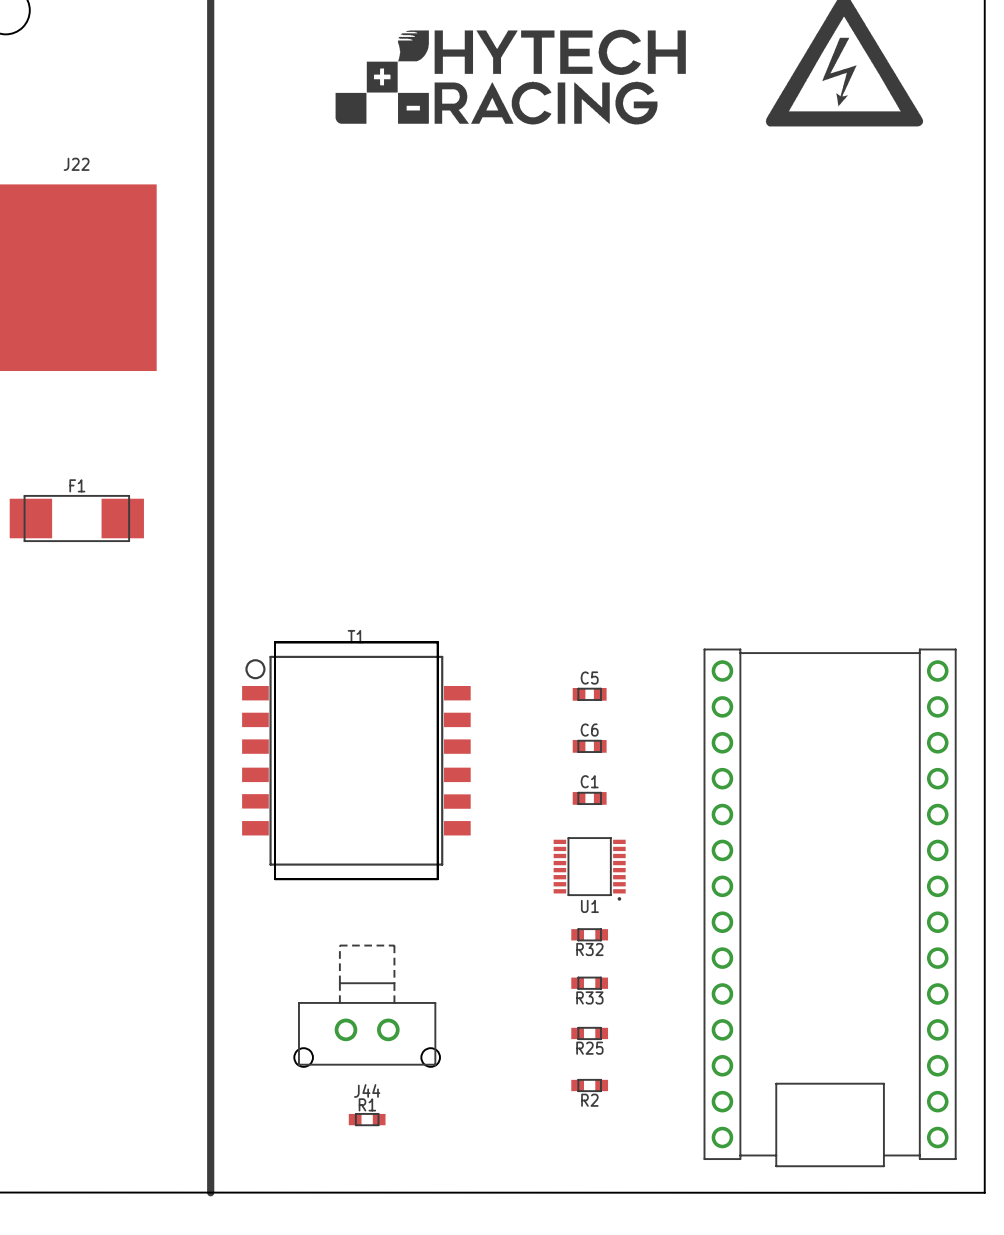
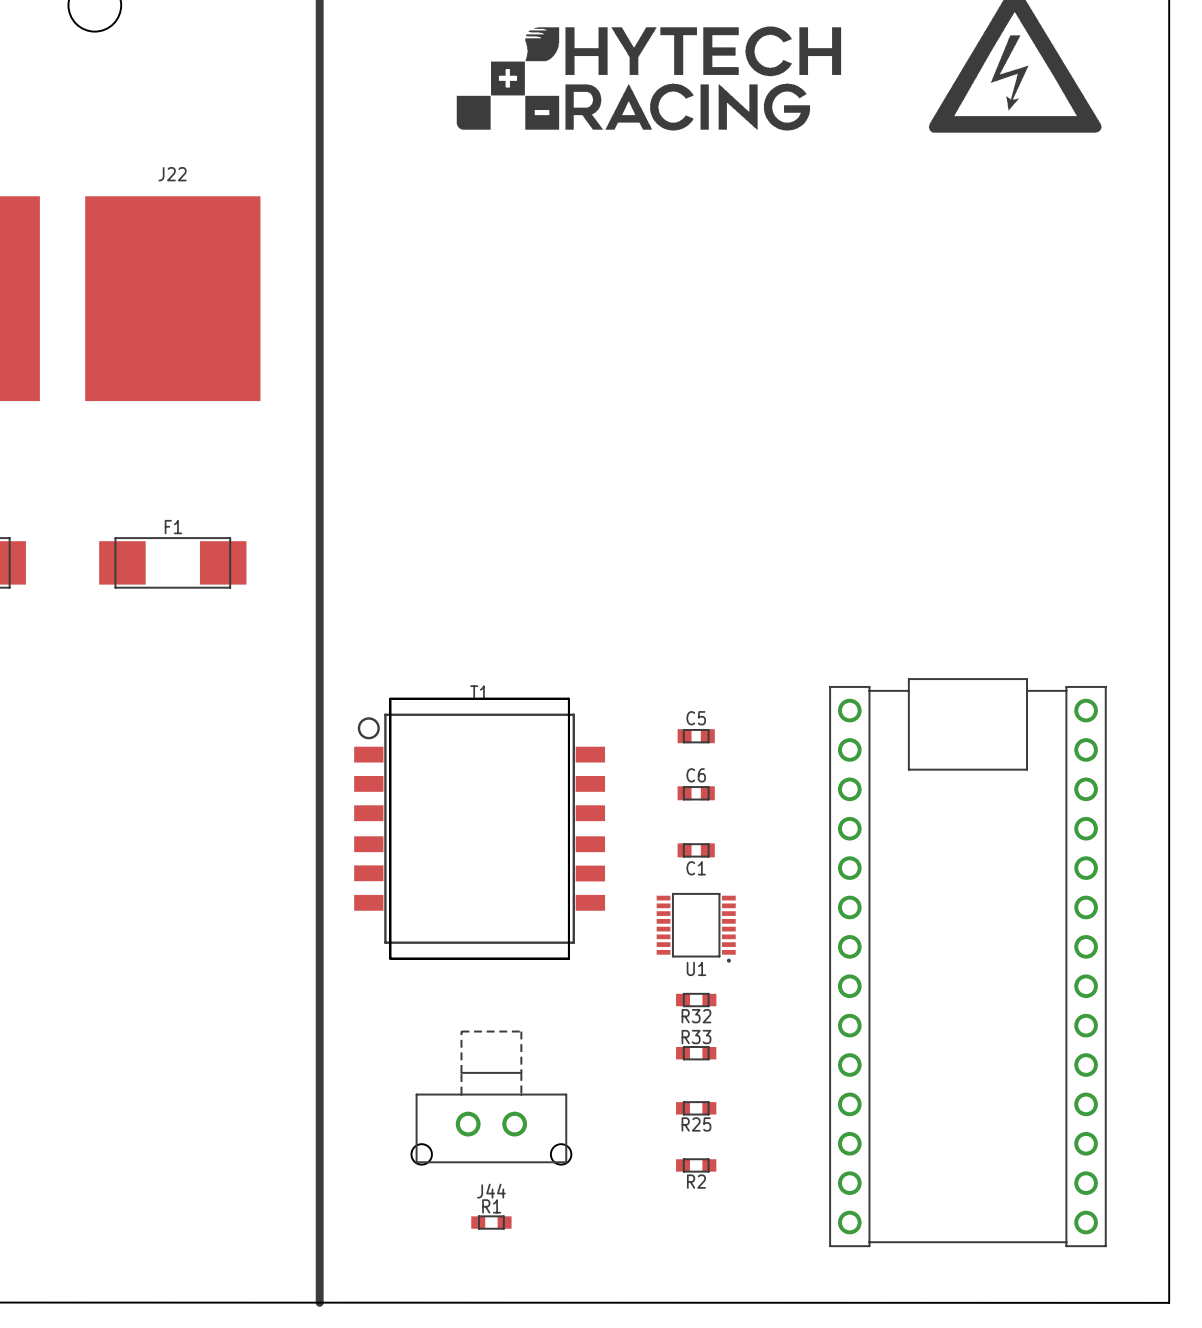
C5 position: (589, 694) -> (696, 736)
C6 position: (589, 746) -> (696, 793)
C1 name position: C1 (589, 781) -> C1 (696, 868)
C1 position: (589, 798) -> (696, 850)
U1 position: (589, 868) -> (696, 927)
part rotation: 0° (830, 907) -> 180° (967, 962)
R32 position: (589, 934) -> (696, 1000)
R33 position: (589, 983) -> (696, 1053)
R33 name position: R33 (589, 997) -> R33 (696, 1037)
R25 position: (589, 1033) -> (696, 1108)
R2 position: (589, 1085) -> (696, 1165)

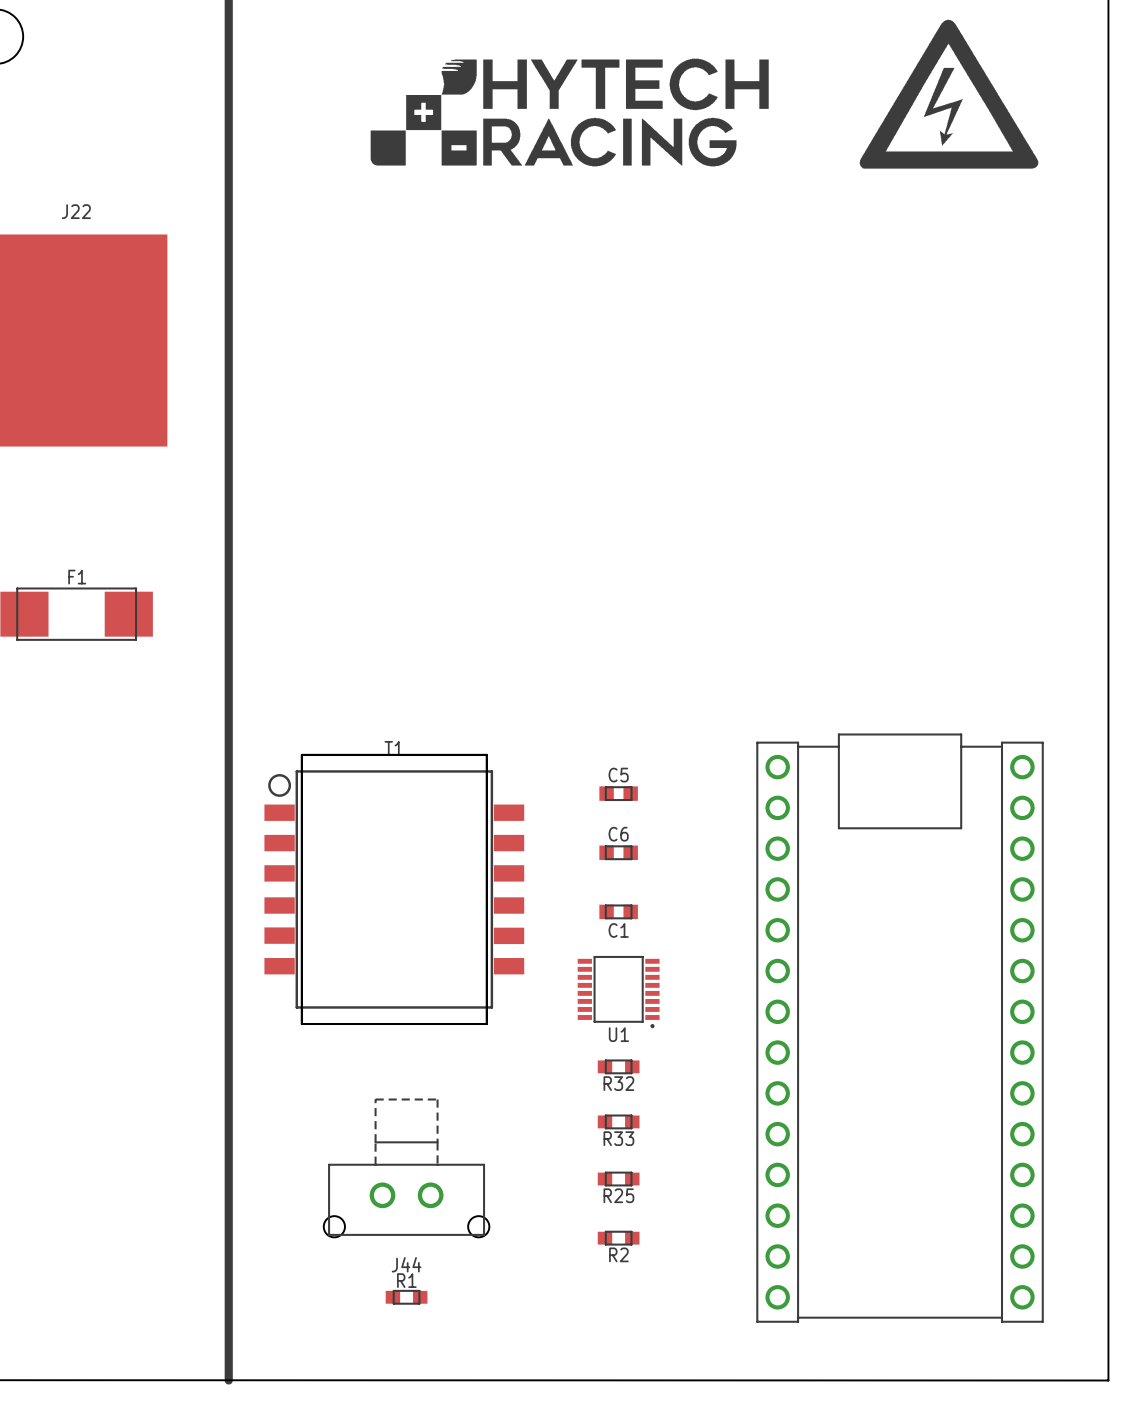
R33 name position: R33 (696, 1037) -> R33 (618, 1138)

